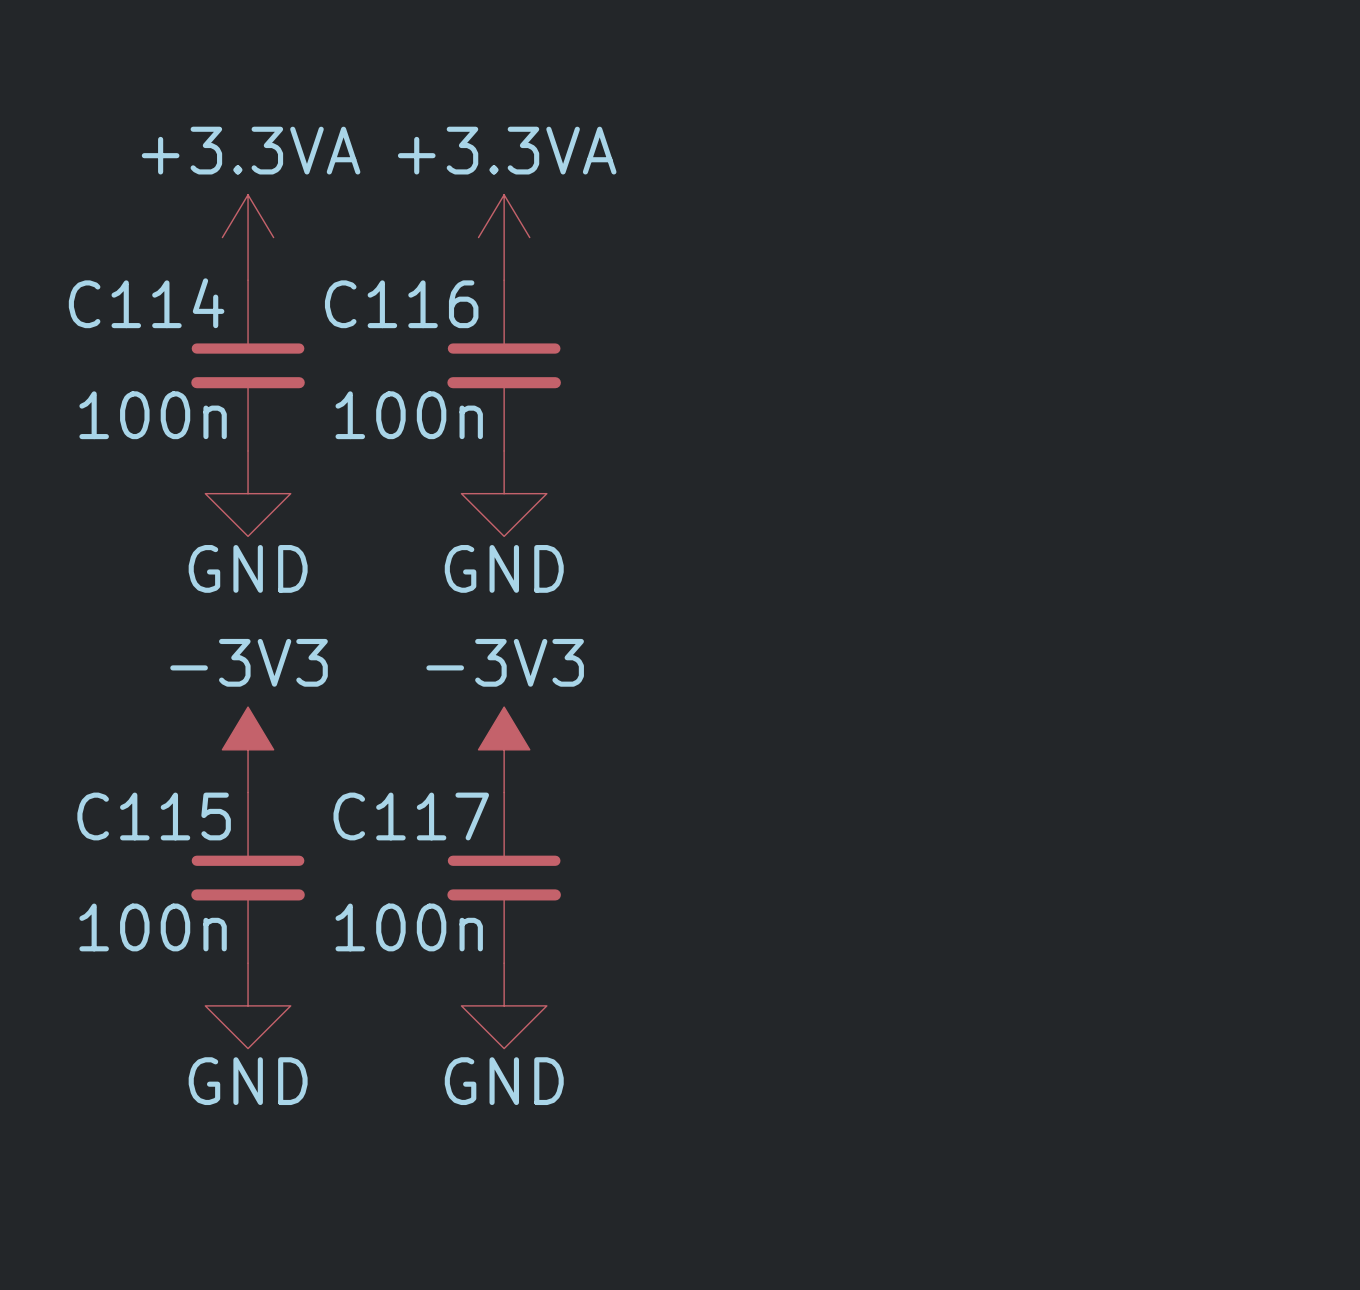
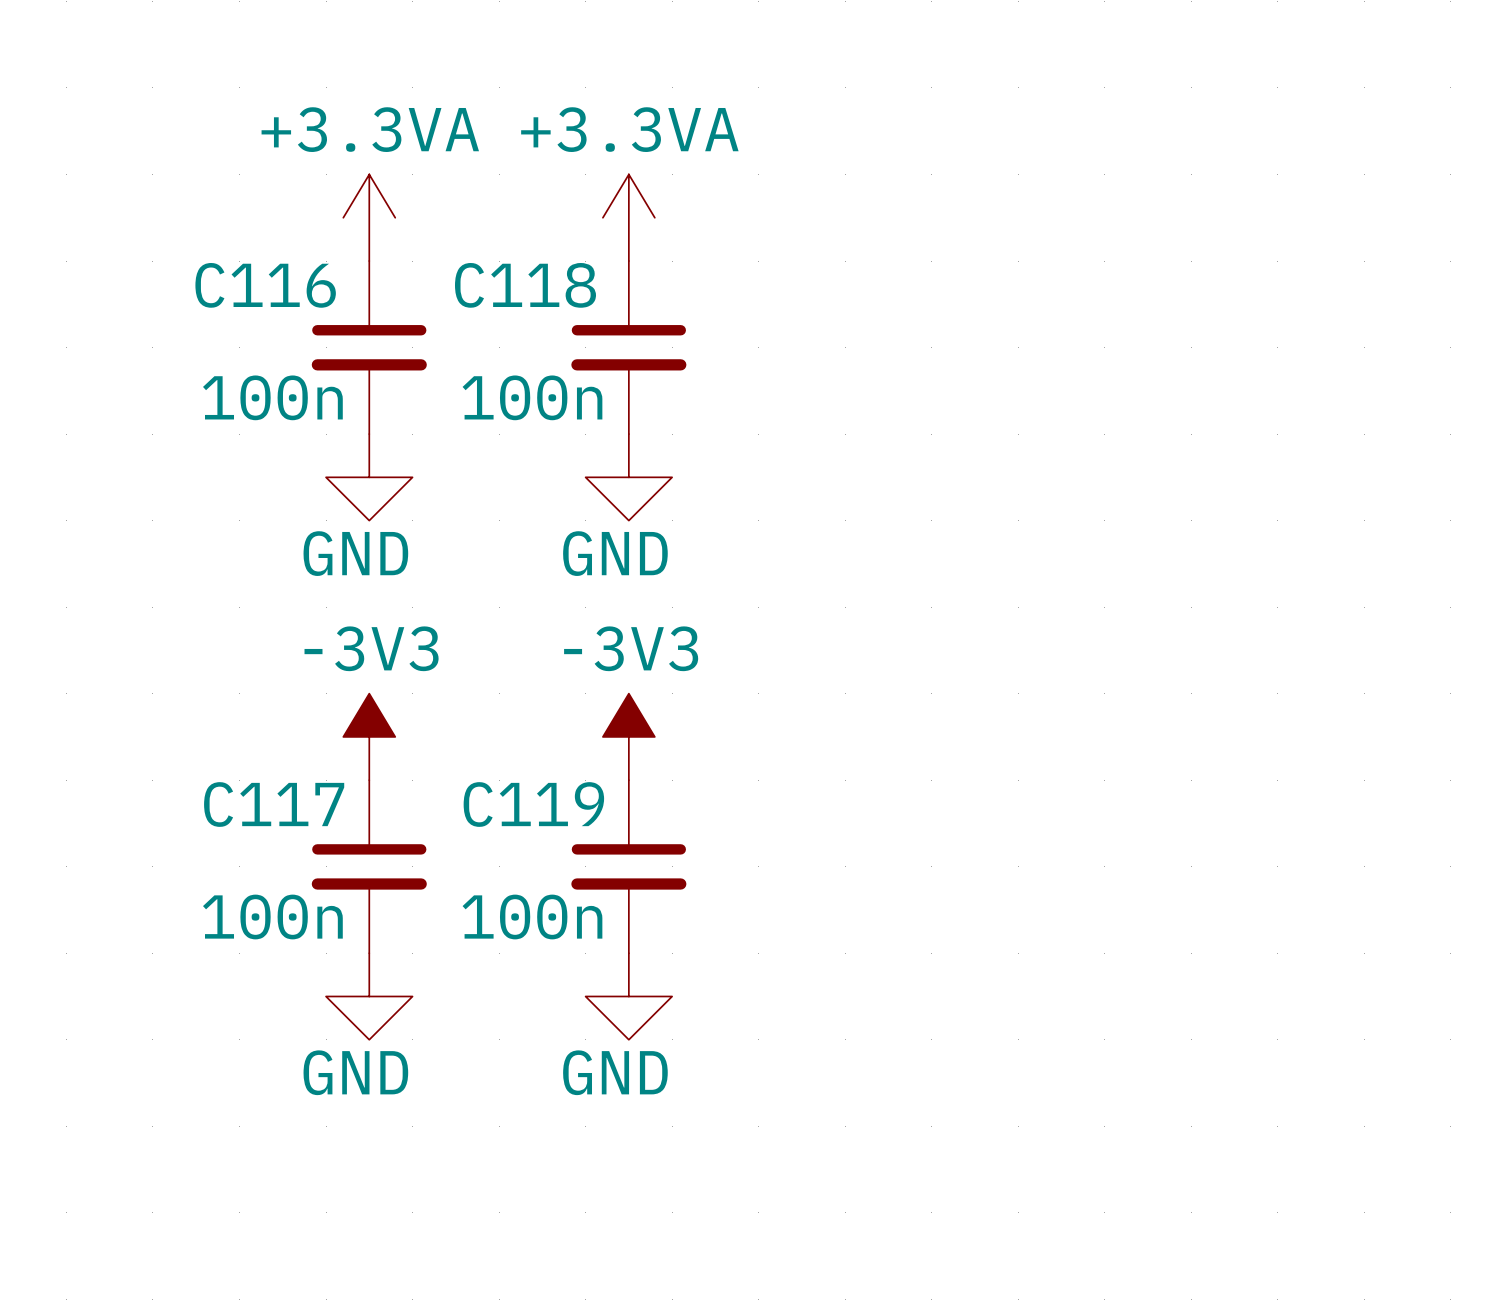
C114 name: C114 (146, 303) -> C116 (265, 285)
C116 name: C116 (401, 304) -> C118 (525, 285)
C115 name: C115 (154, 816) -> C117 (274, 804)
C117 name: C117 (411, 816) -> C119 (533, 804)

